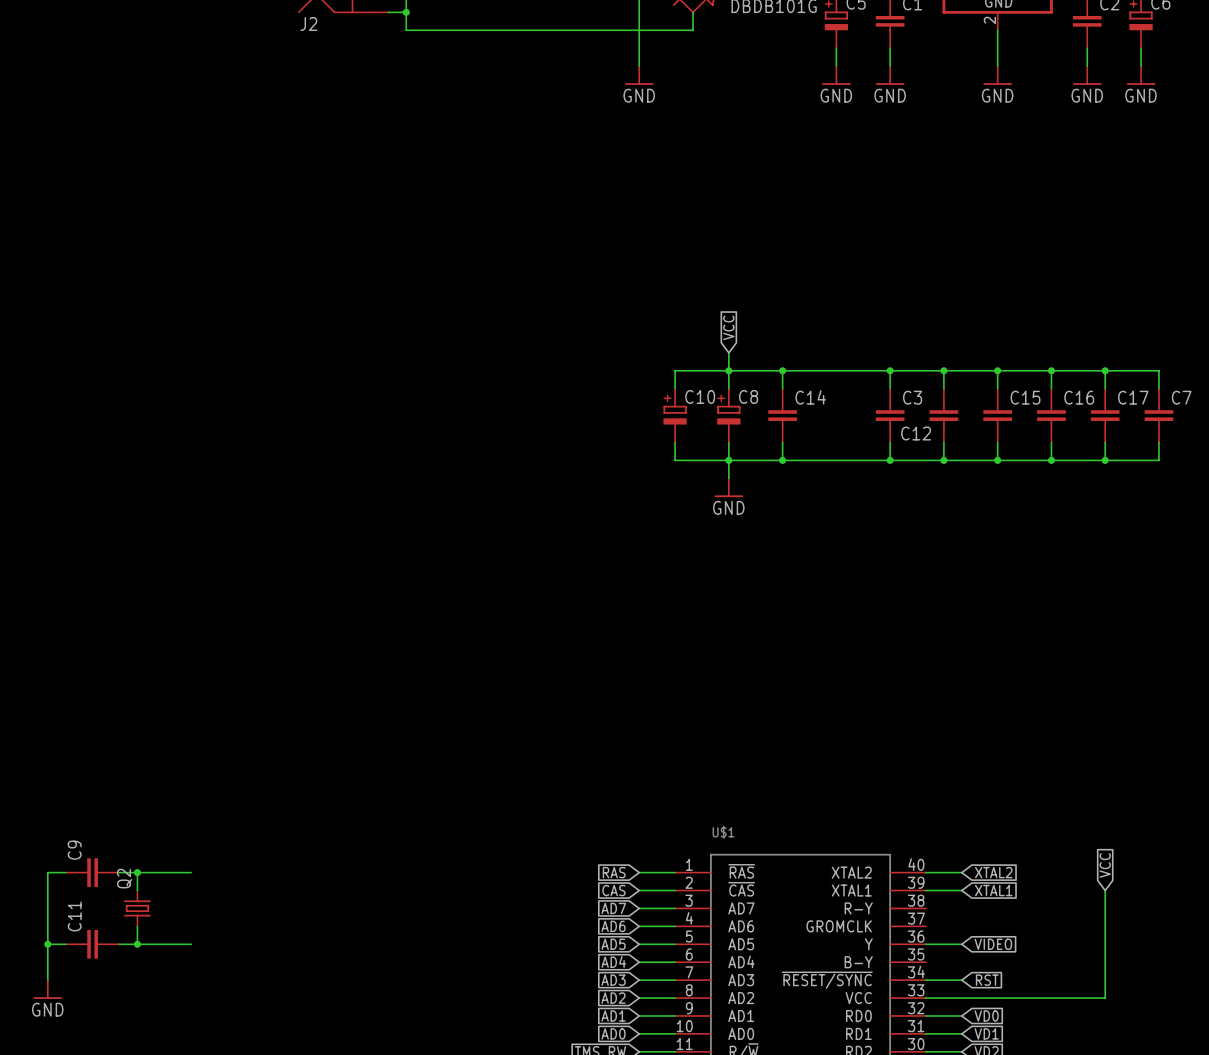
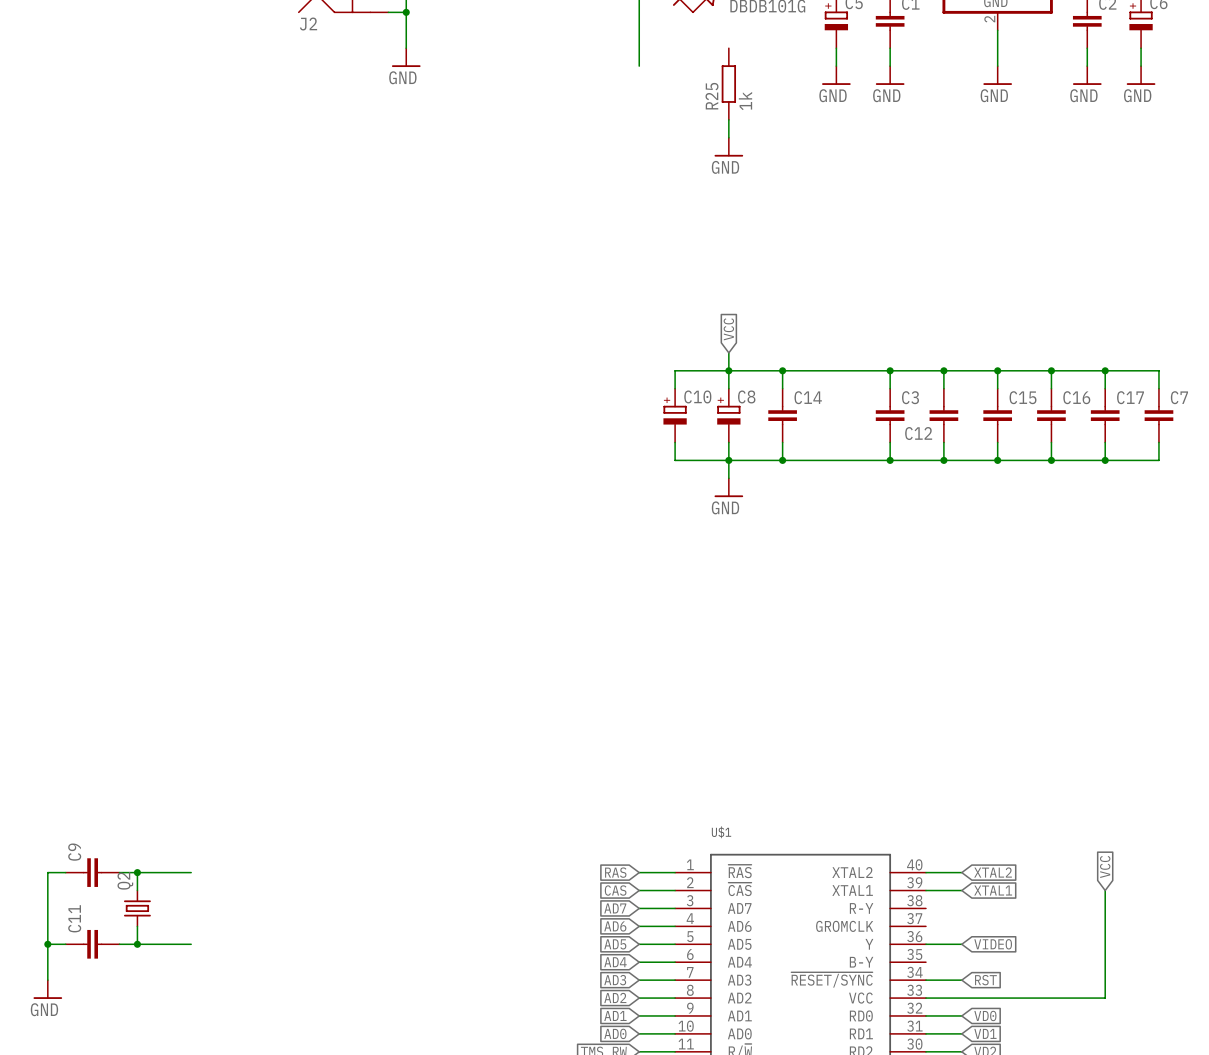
wire: (693, 12) (693, 30) (406, 30) -> (406, 48) (406, 30)
power symbol: none -> GND (406, 57)
power symbol position: GND (639, 75) -> GND (728, 147)
R25: none -> 1k (728, 84)
wire: none -> (728, 119) (728, 137)

